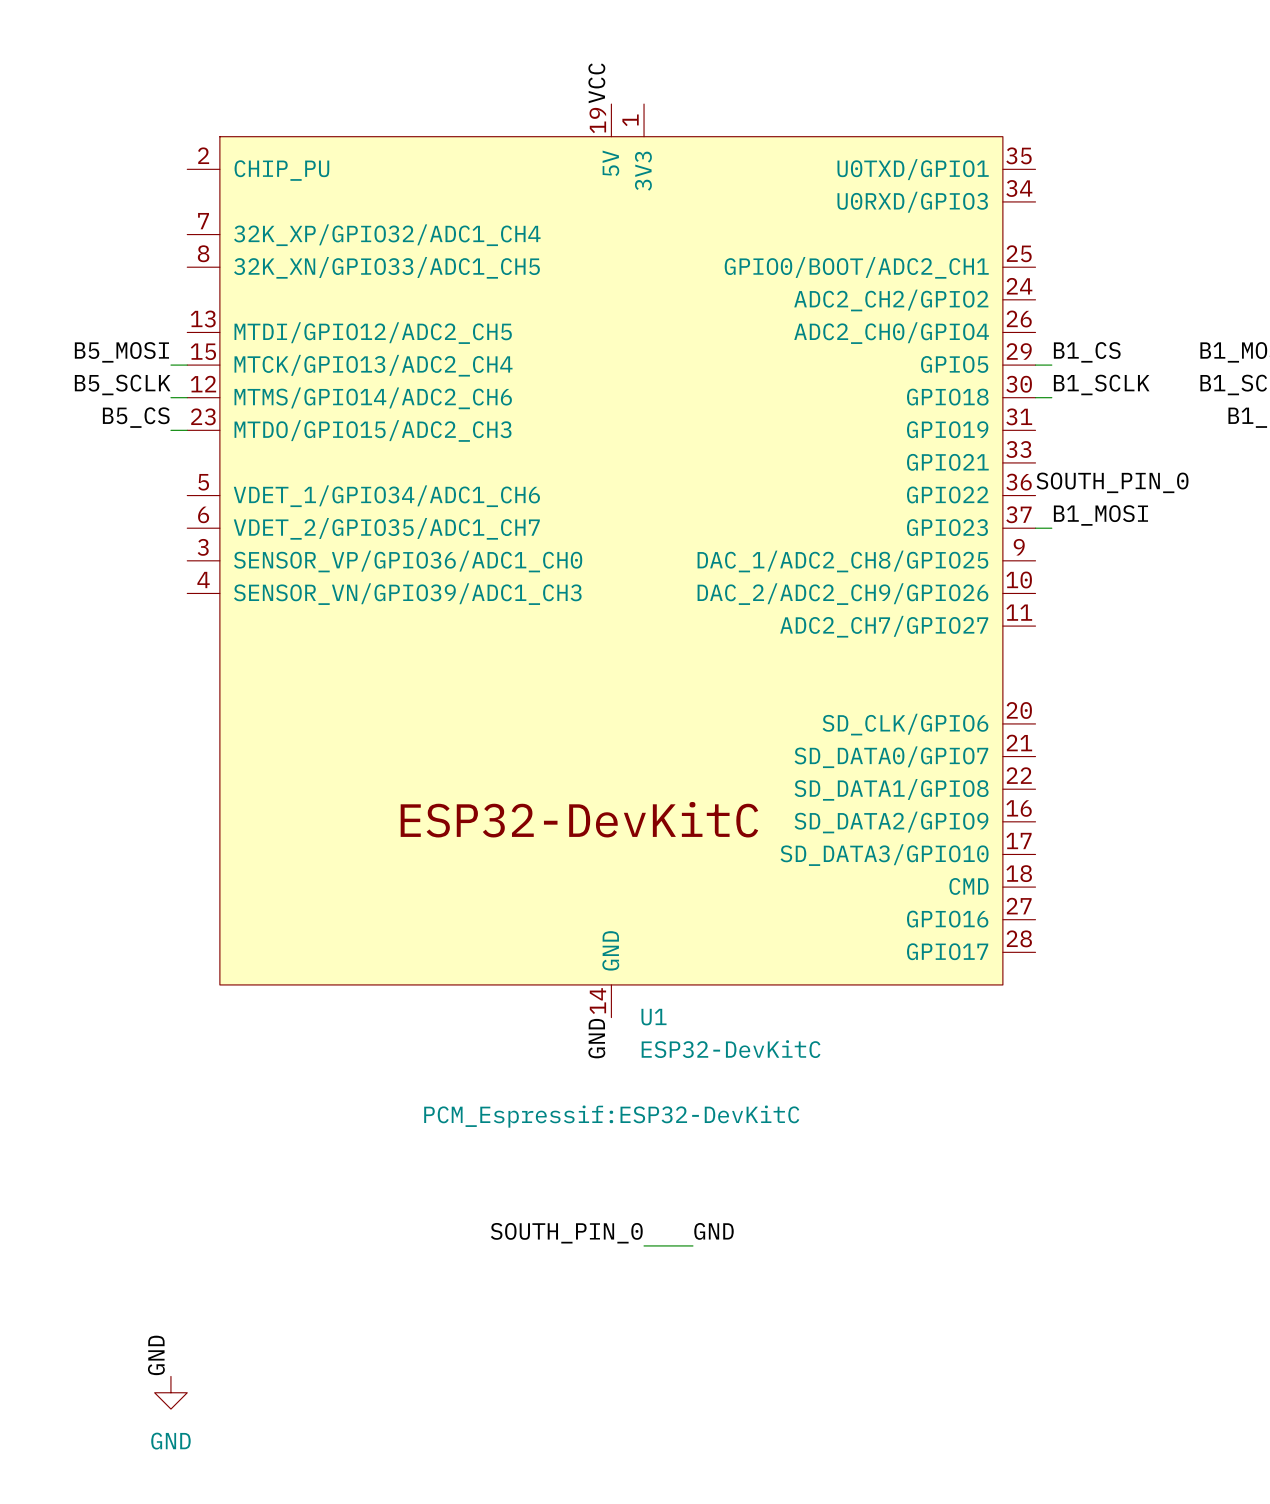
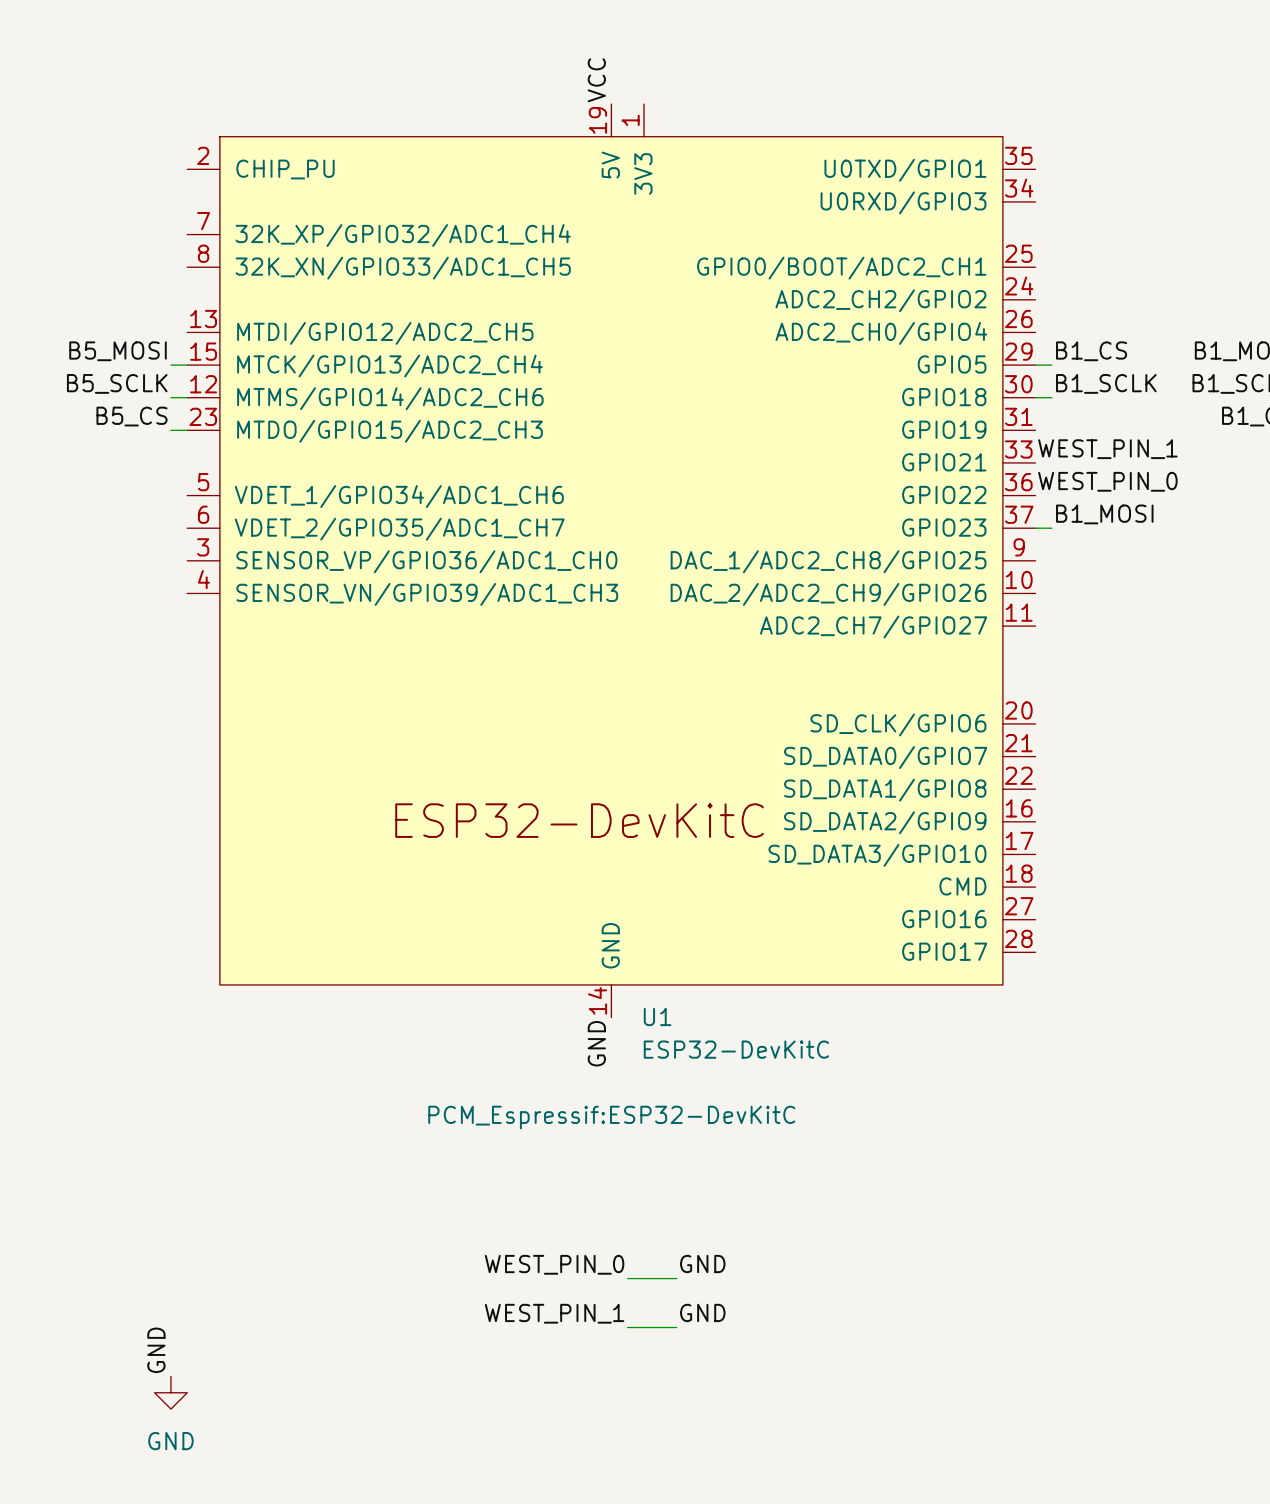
label: none -> WEST_PIN_1 (1107, 449)
label: SOUTH_PIN_0 (1112, 482) -> WEST_PIN_0 (1107, 481)
label position: GND (713, 1231) -> GND (702, 1264)
label: SOUTH_PIN_0 (566, 1233) -> WEST_PIN_0 (554, 1264)
wire: (644, 1245) (692, 1245) -> (627, 1278) (676, 1278)
label: none -> GND (702, 1312)
label: none -> WEST_PIN_1 (554, 1313)
wire: none -> (627, 1327) (676, 1327)

